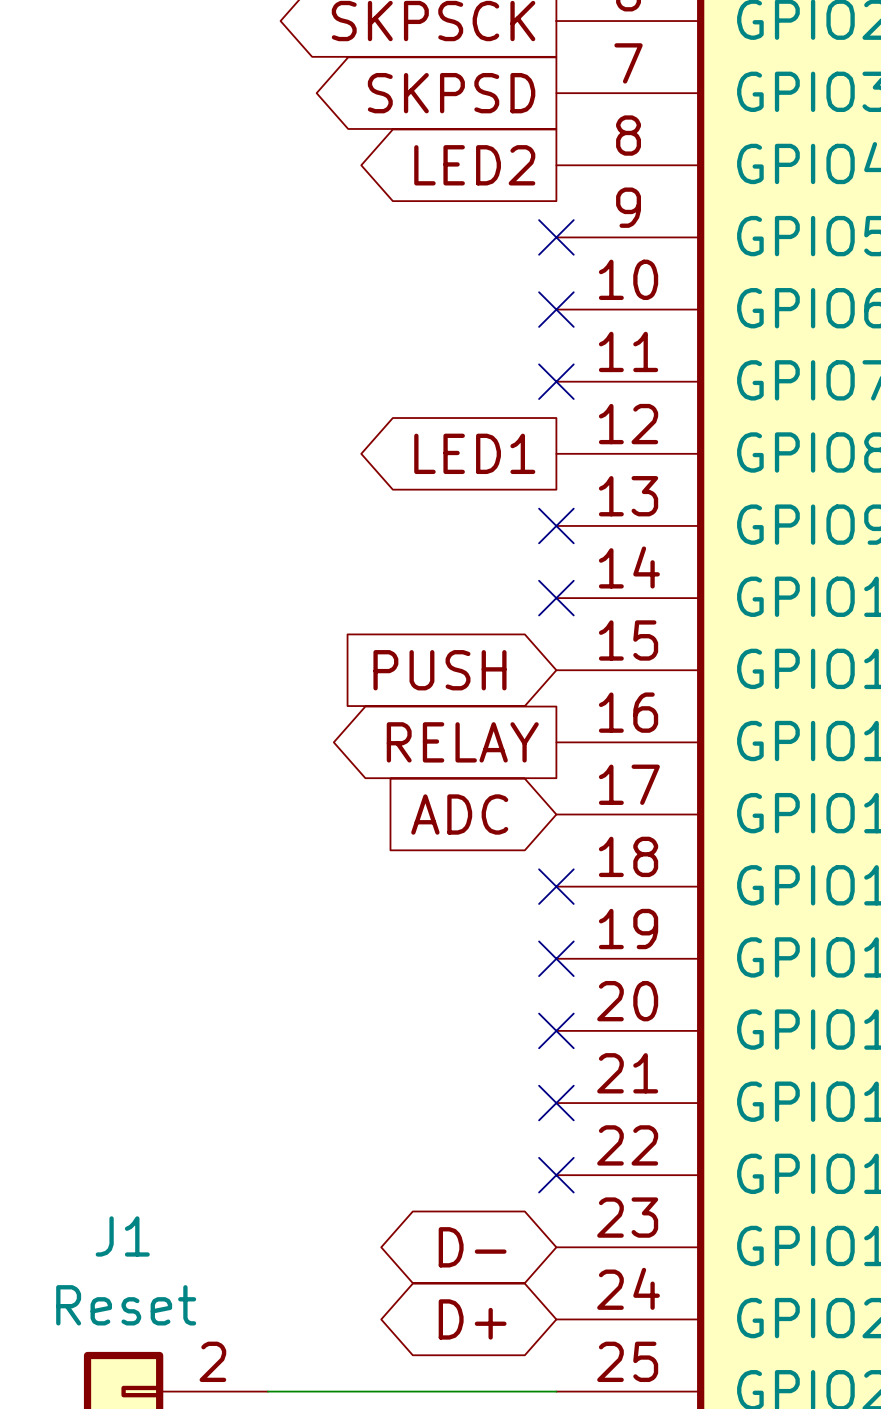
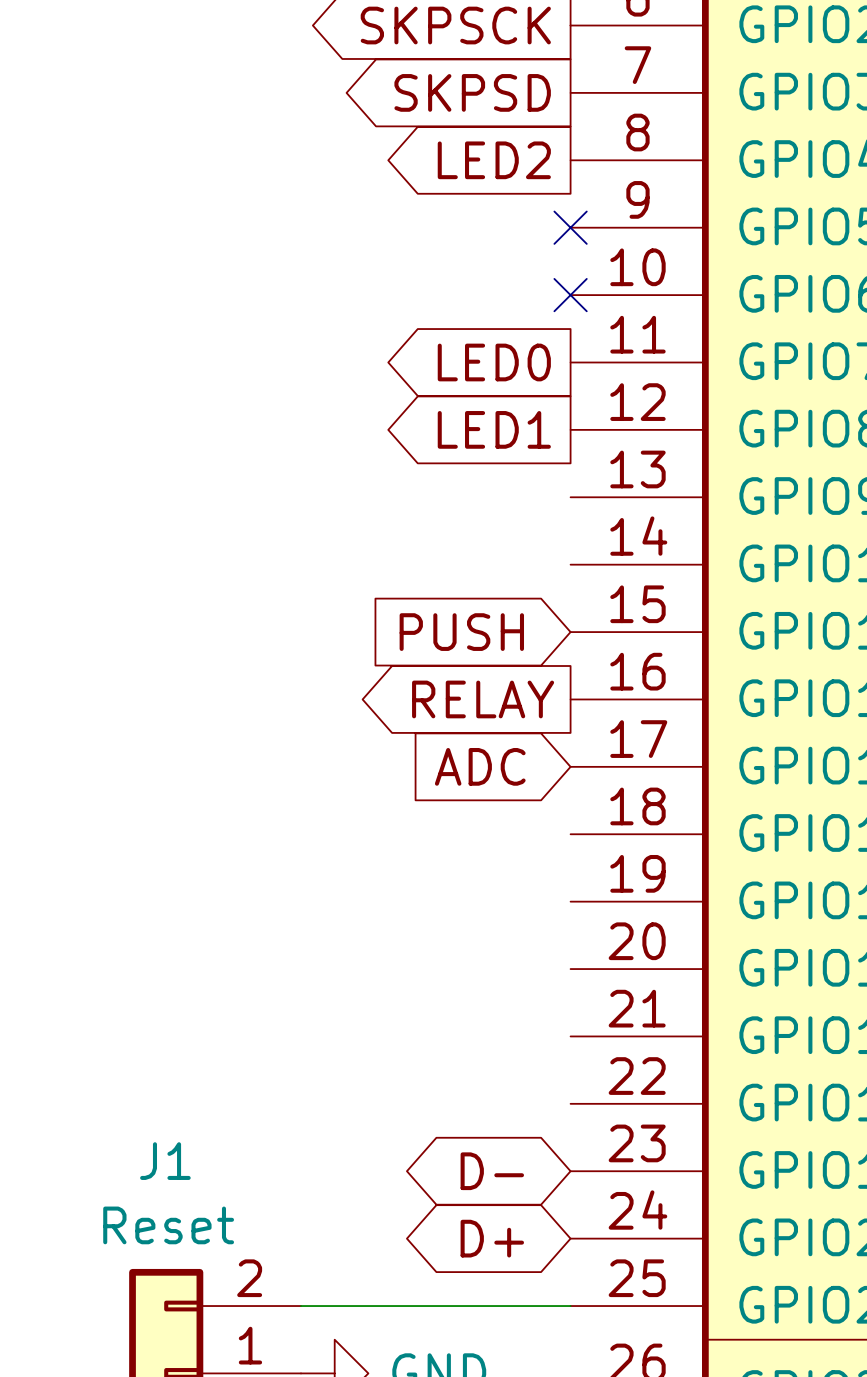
global label: none -> LED0 (494, 362)
no-connect mark: (556, 381) -> none
no-connect mark: (556, 525) -> none
no-connect mark: (556, 598) -> none
no-connect mark: (556, 886) -> none
no-connect mark: (556, 958) -> none
no-connect mark: (556, 1030) -> none
no-connect mark: (556, 1103) -> none
no-connect mark: (556, 1175) -> none

